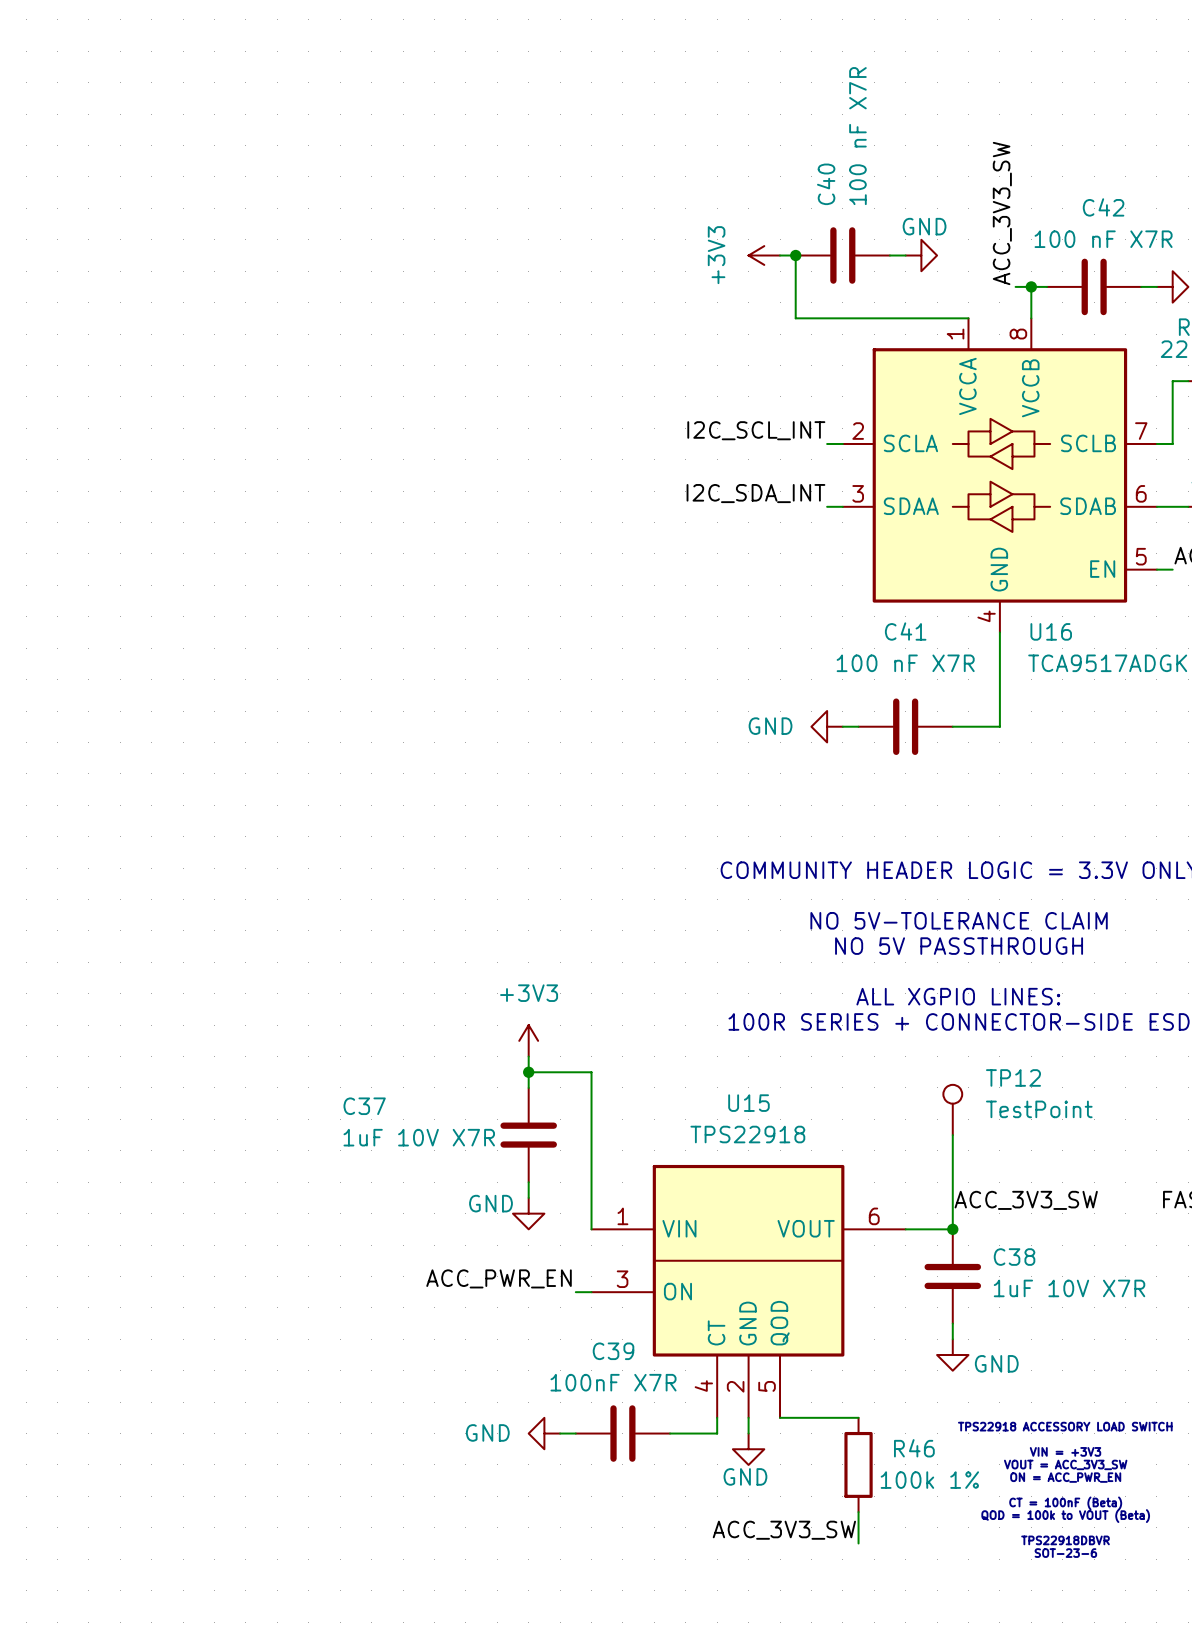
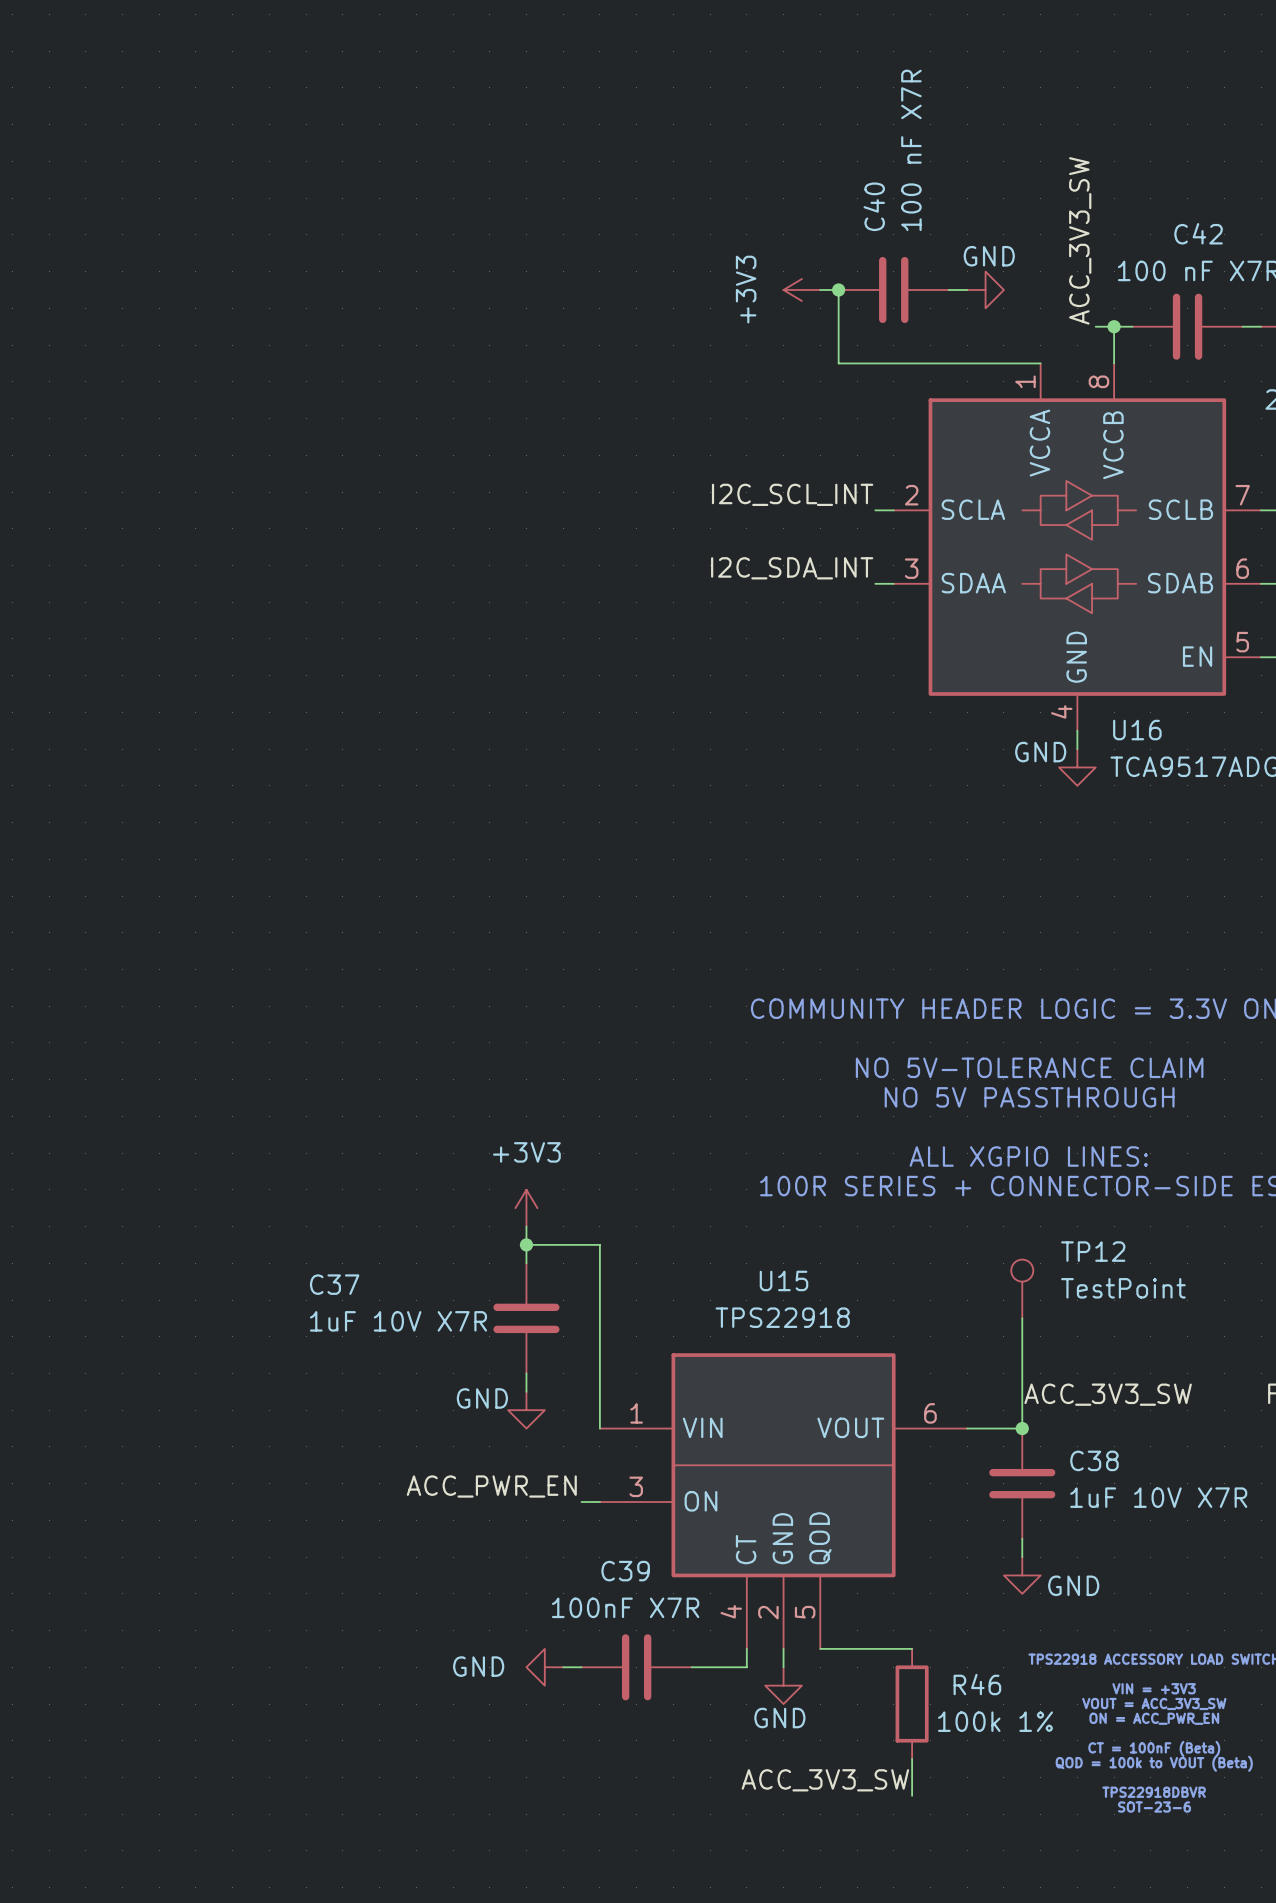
wire: (999, 648) (999, 726) (952, 726) -> none
power symbol text position: GND (770, 726) -> GND (1040, 752)
power symbol rotation: 0° (827, 726) -> 90° counterclockwise (1077, 767)
power symbol position: GND (827, 726) -> GND (1077, 767)
wire: (842, 726) (858, 726) -> none
C41: 100 nF X7R (905, 726) -> none

